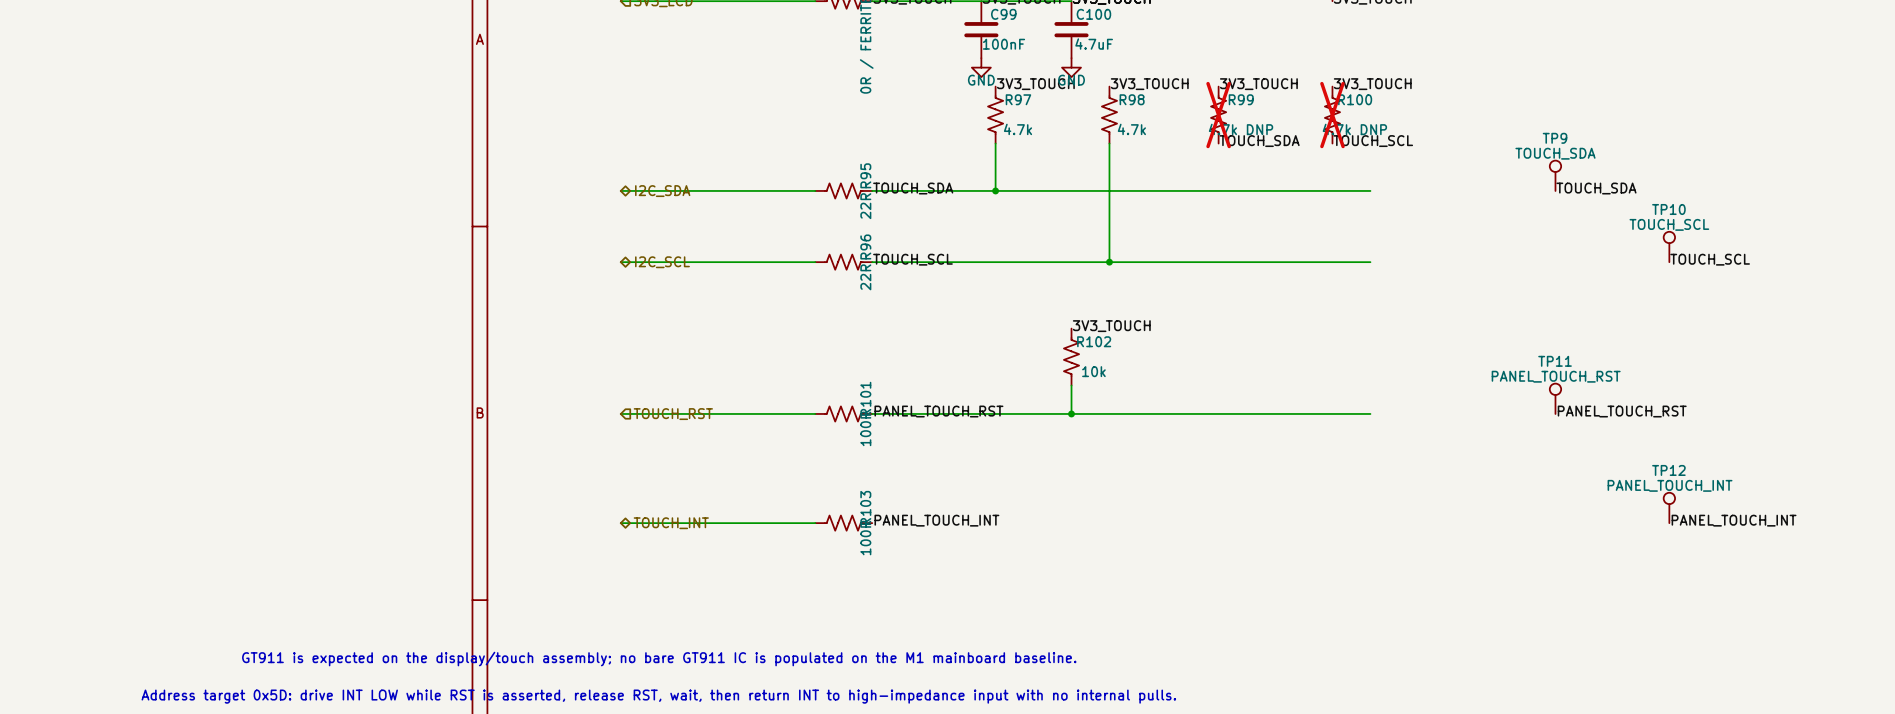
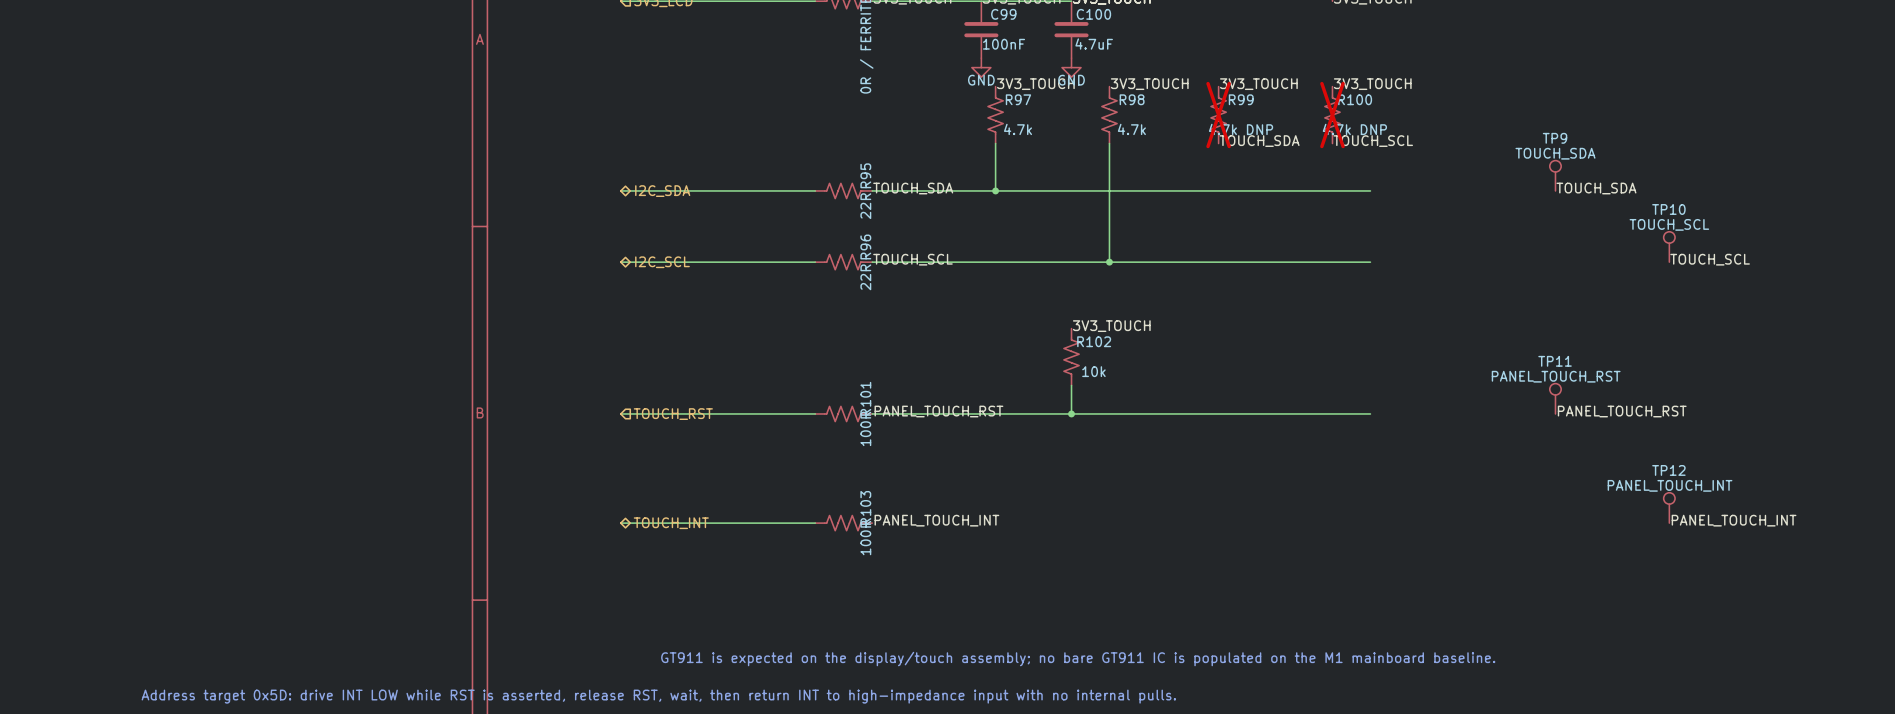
text position: GT911 is expected on the display/touch assembly; no bare GT911 IC is populated on the M1 mainboard baseline. (659, 659) -> GT911 is expected on the display/touch assembly; no bare GT911 IC is populated on the M1 mainboard baseline. (1078, 659)

